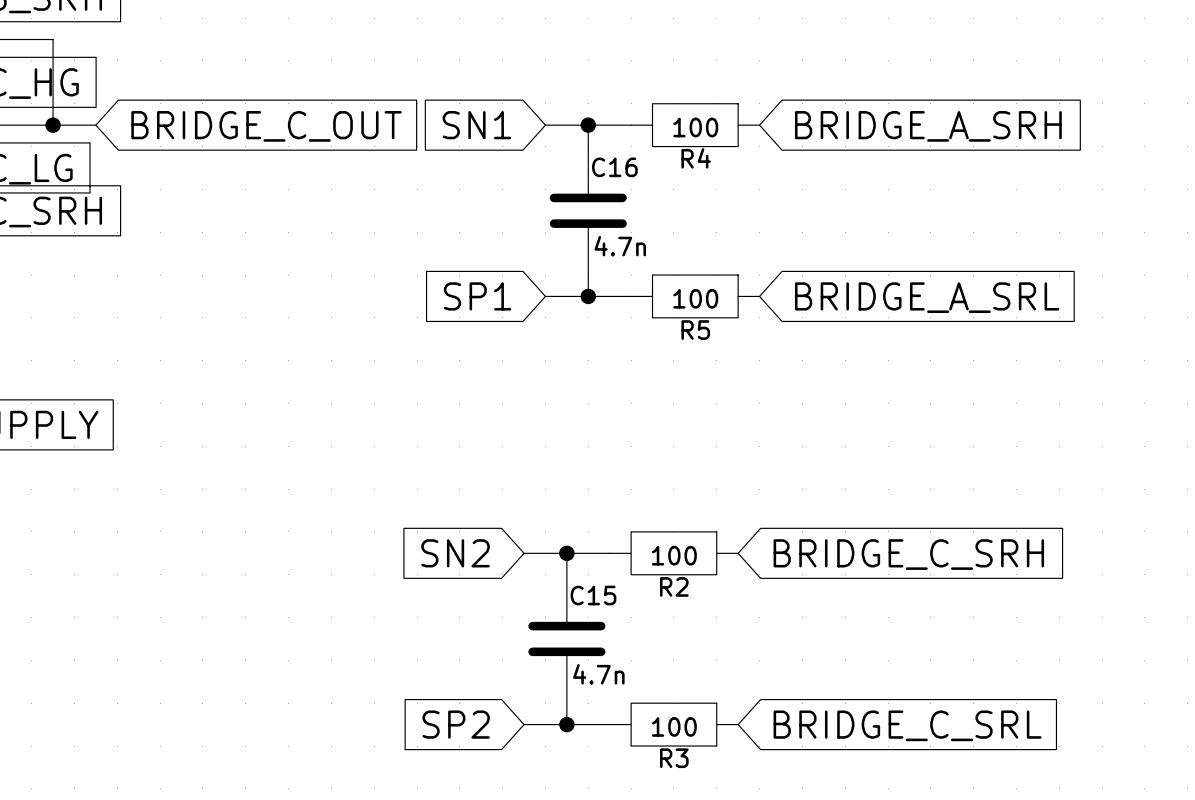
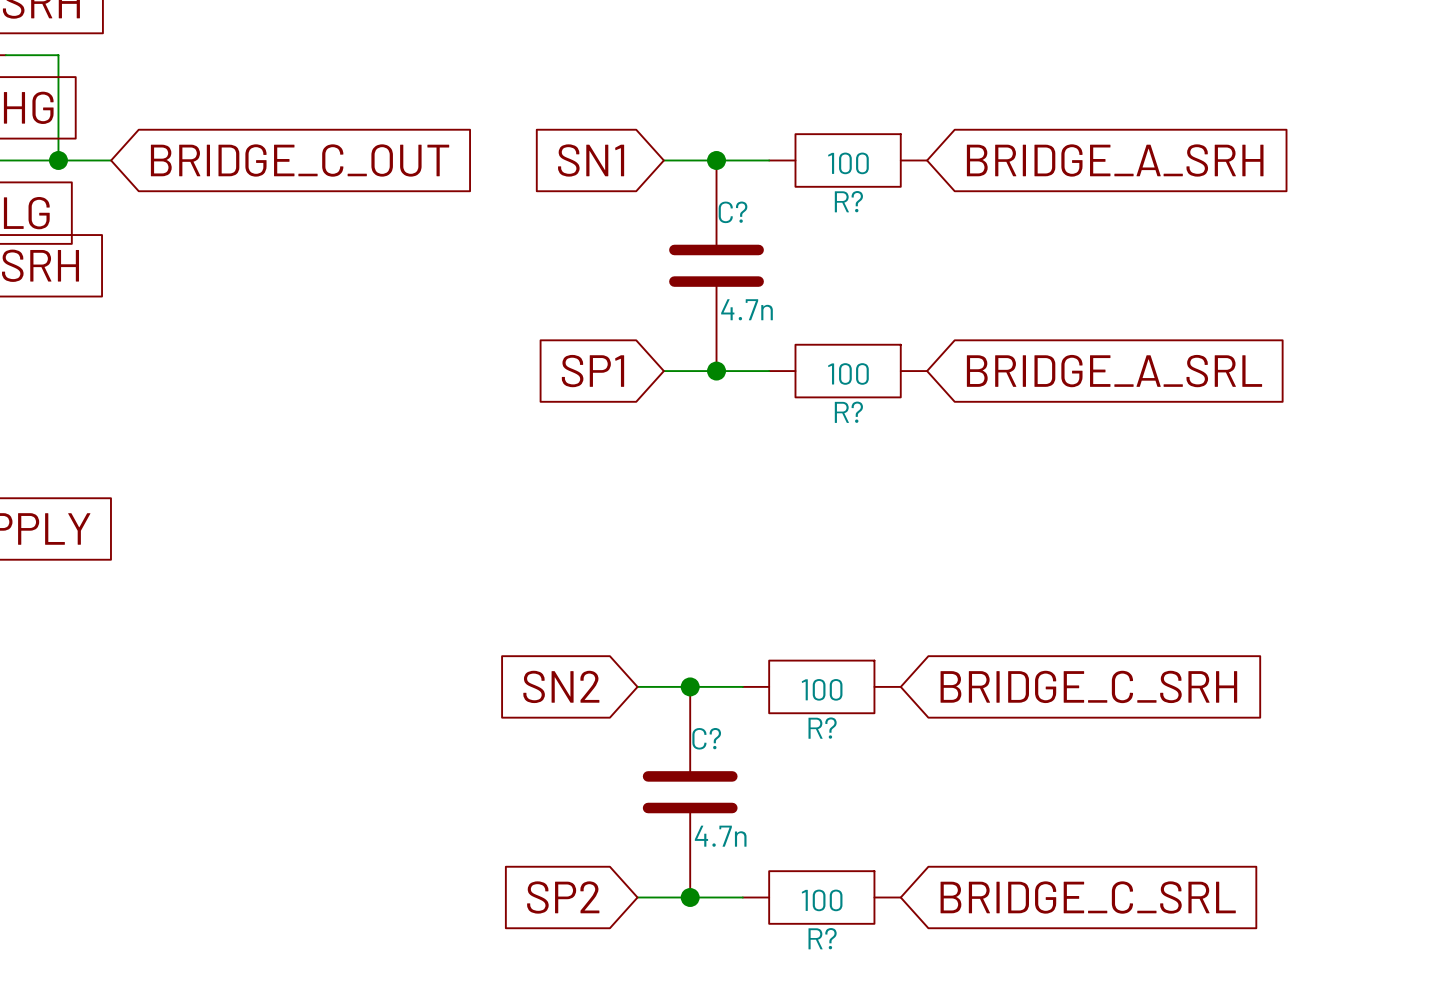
R4 name: R4 (696, 158) -> R? (848, 201)
C16 name: C16 (614, 167) -> C? (733, 212)
R5 name: R5 (695, 330) -> R? (848, 412)
R2 name: R2 (674, 586) -> R? (822, 728)
C15 name: C15 (593, 595) -> C? (706, 738)
R3 name: R3 (674, 758) -> R? (822, 938)

